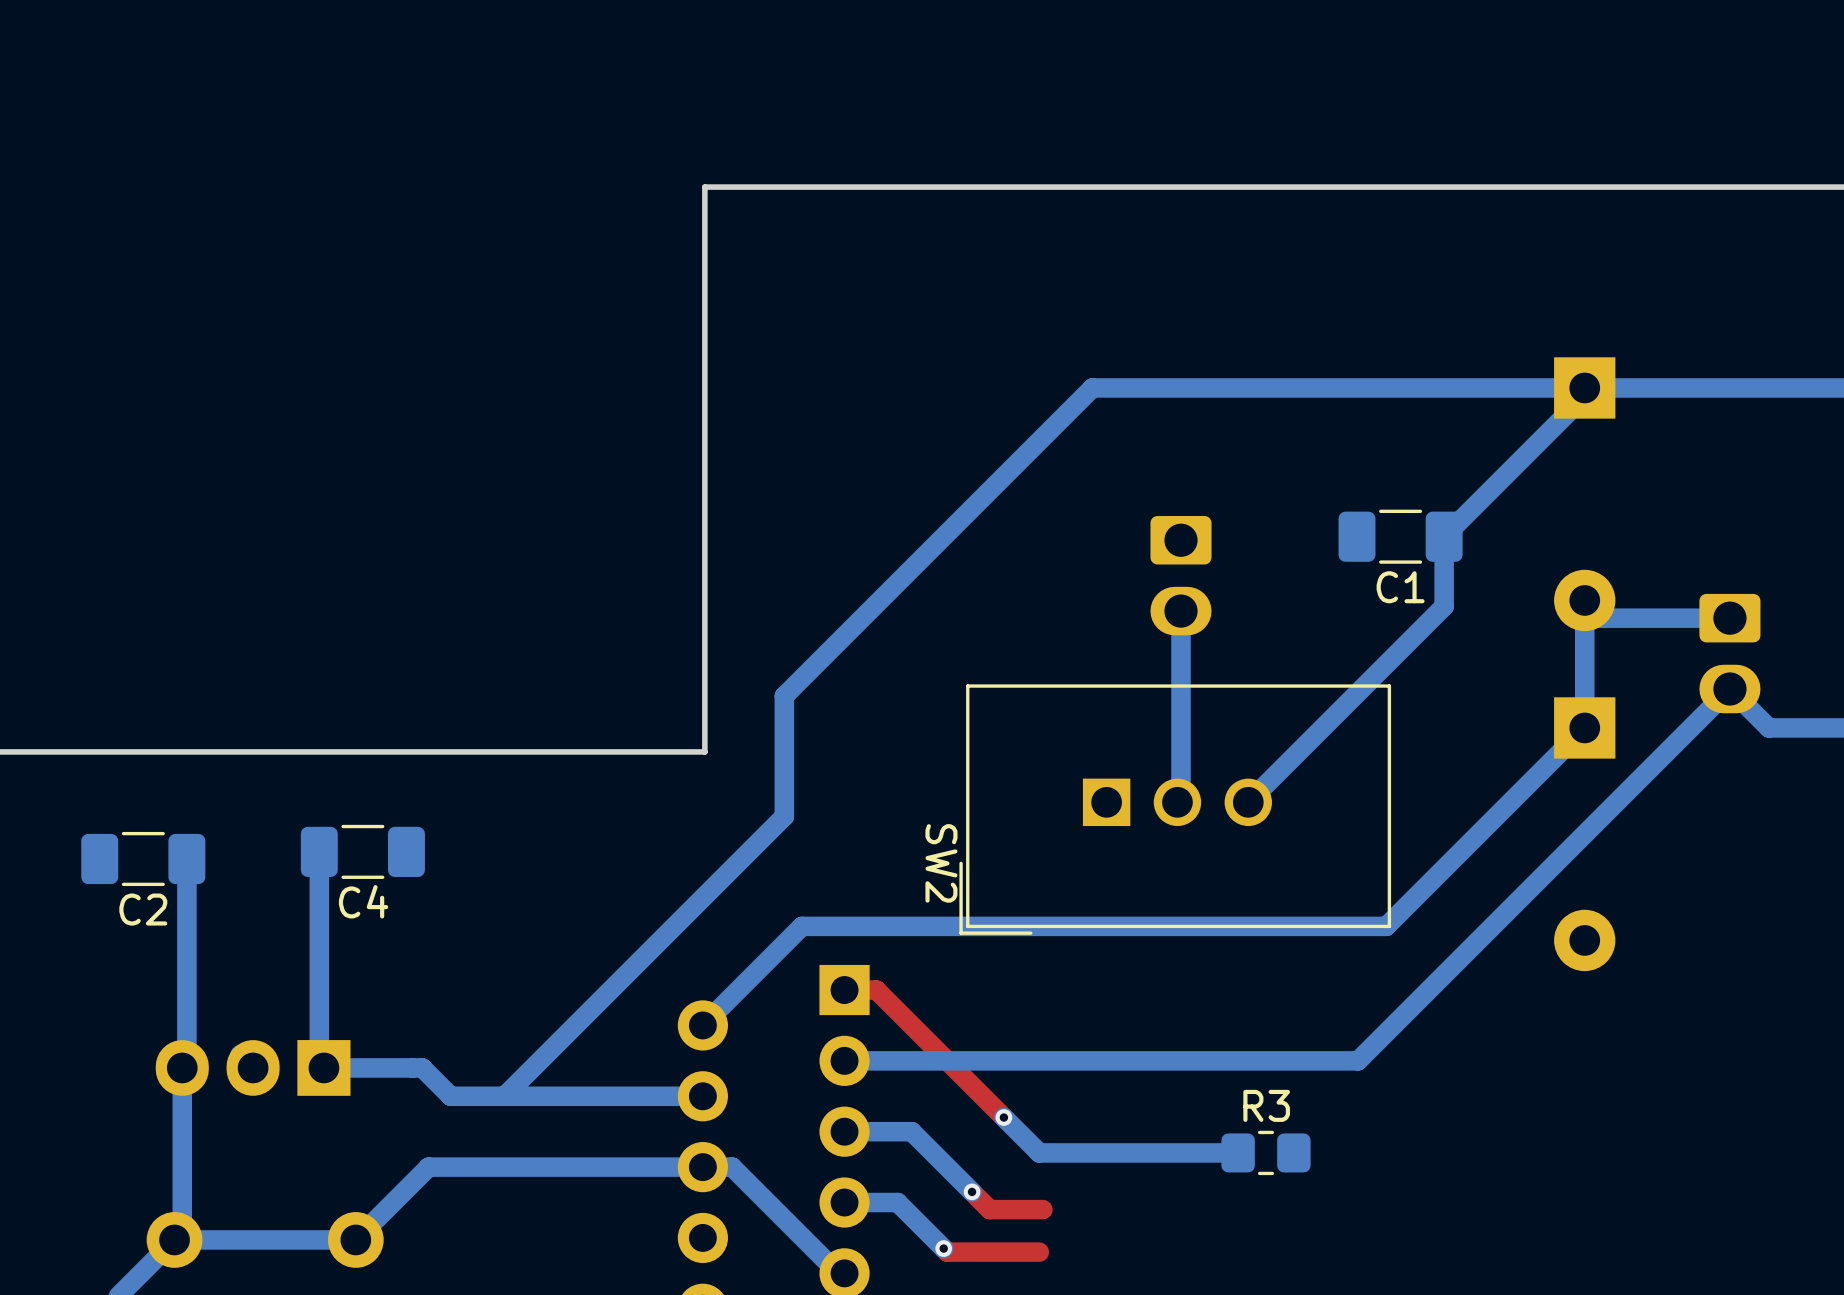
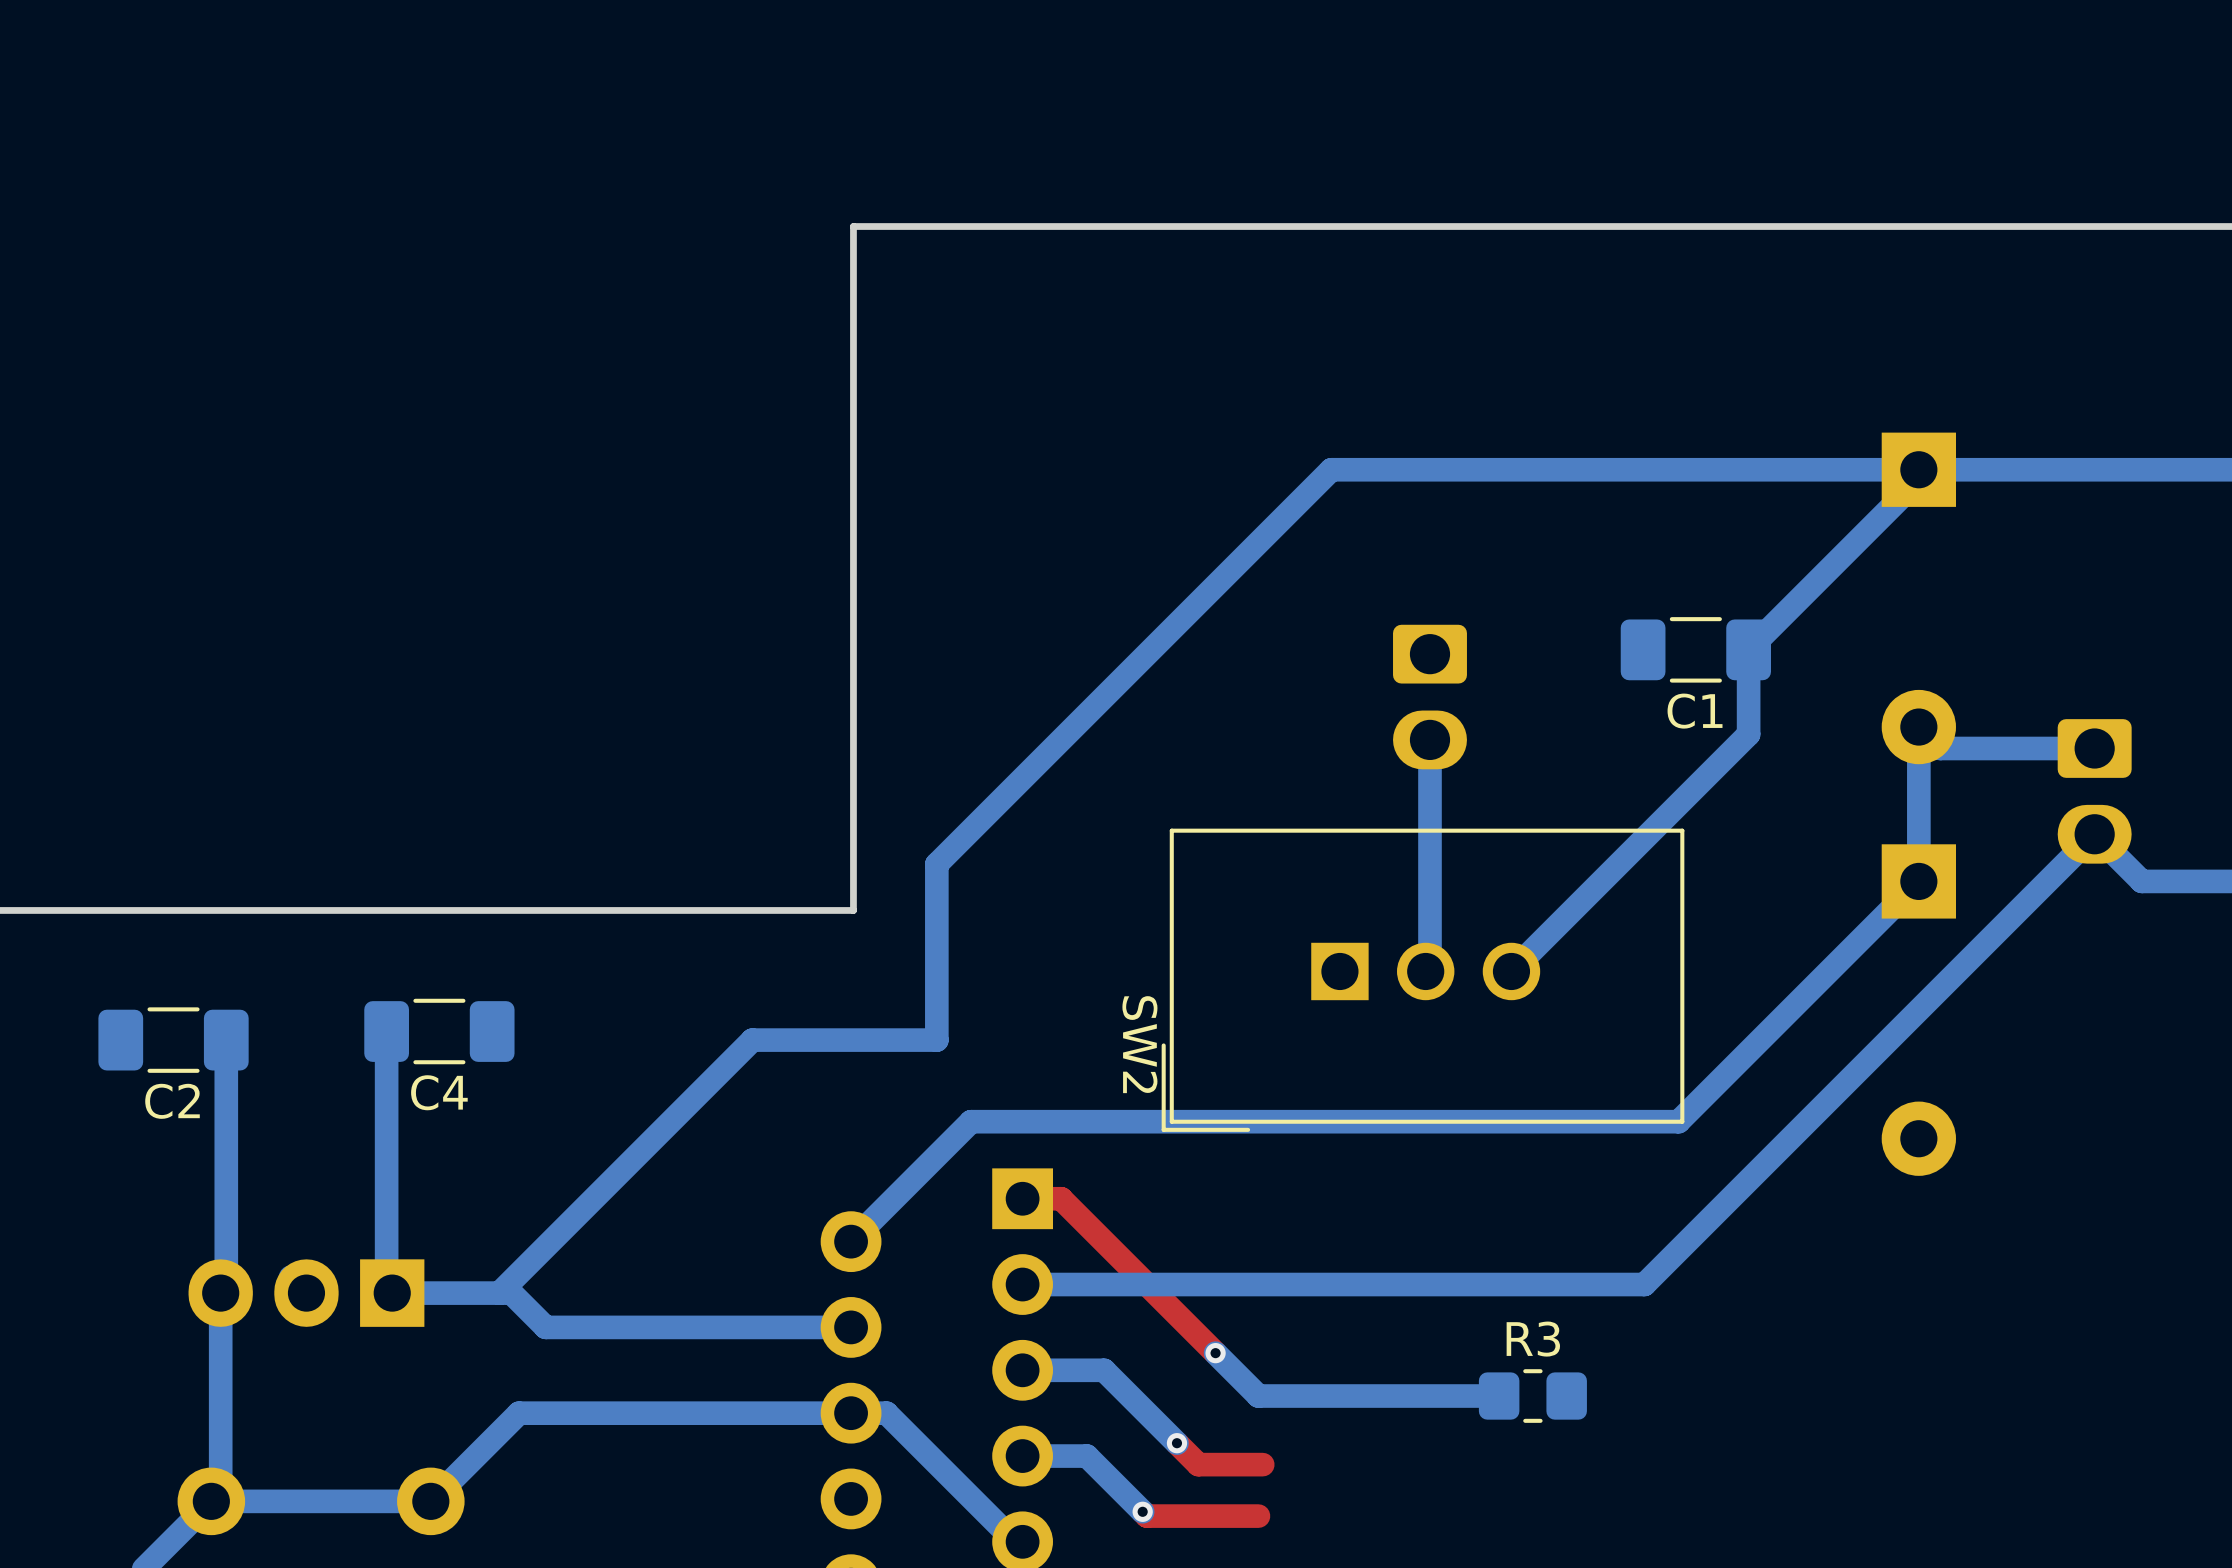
bottom track: (1099, 387) (1092, 387) (784, 696) (784, 816) (504, 1096) -> (1331, 469) (936, 864) (936, 1040) (752, 1040) (499, 1293)

